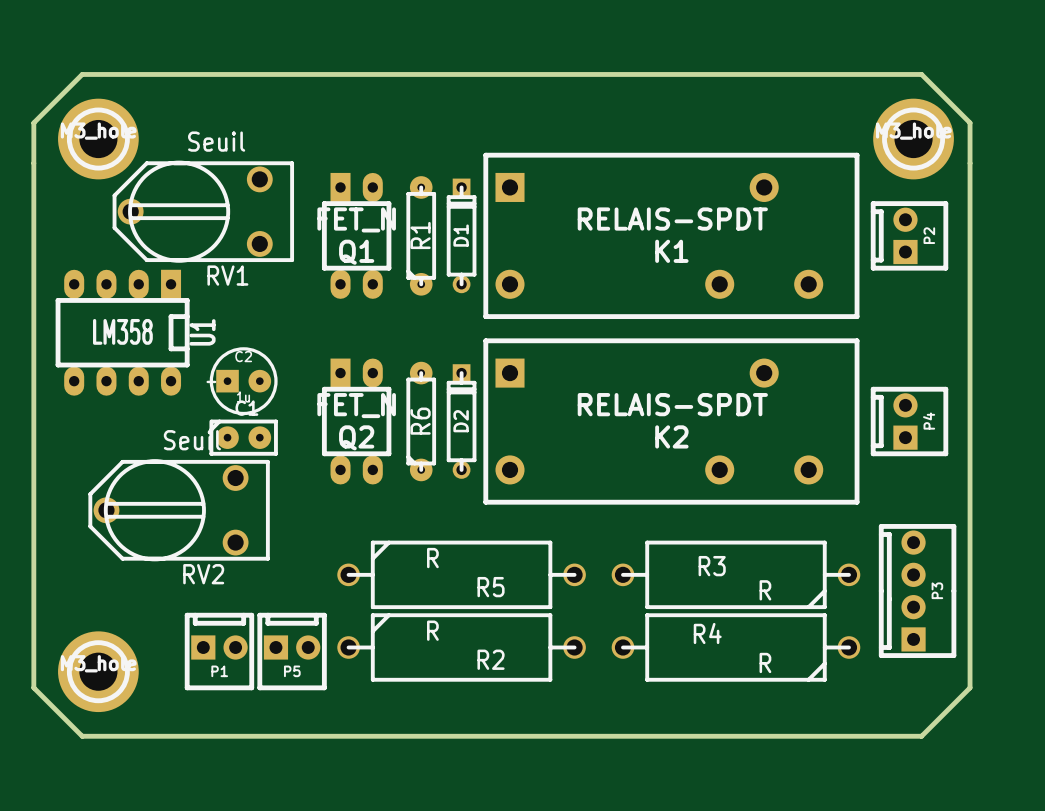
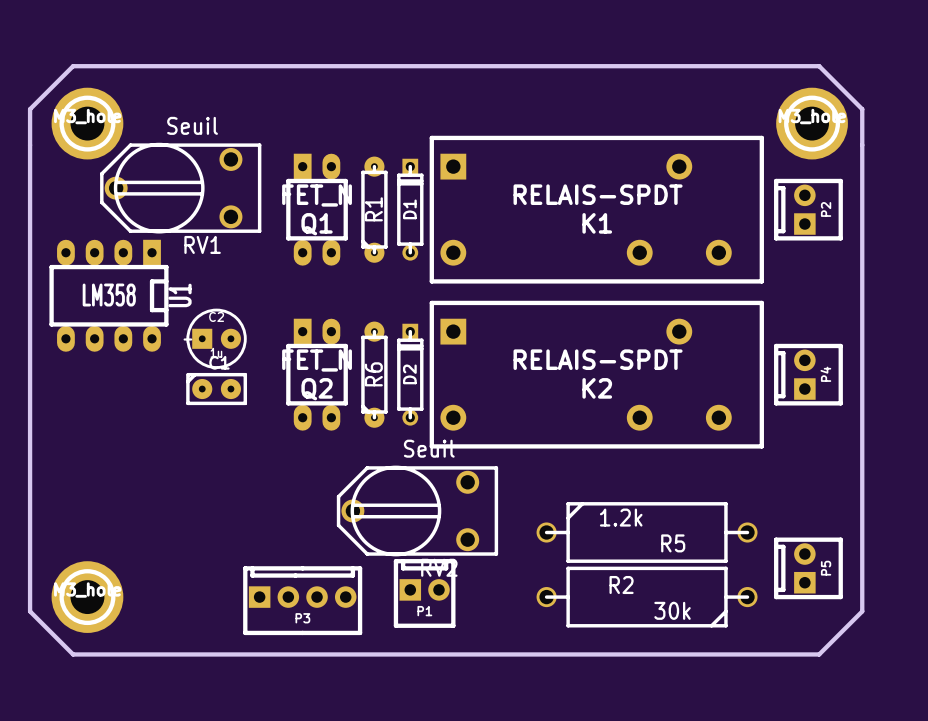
RV2 position: (179, 510) -> (417, 510)
R5 value: R (432, 558) -> 1.2k (621, 517)
R5 position: (461, 574) -> (647, 532)
R3: R (735, 574) -> none
P3 rotation: 0° (917, 591) -> 90° clockwise (302, 600)
P3 position: (917, 591) -> (302, 600)
R2 value: R (432, 630) -> 30k (672, 610)
R2 rotation: 0° (461, 647) -> 180° (647, 597)
R2 position: (461, 647) -> (647, 597)
R4: R (735, 647) -> none
P1 position: (219, 651) -> (424, 593)
P5 rotation: 0° (292, 651) -> 90° counterclockwise (808, 568)
P5 position: (292, 651) -> (808, 568)

